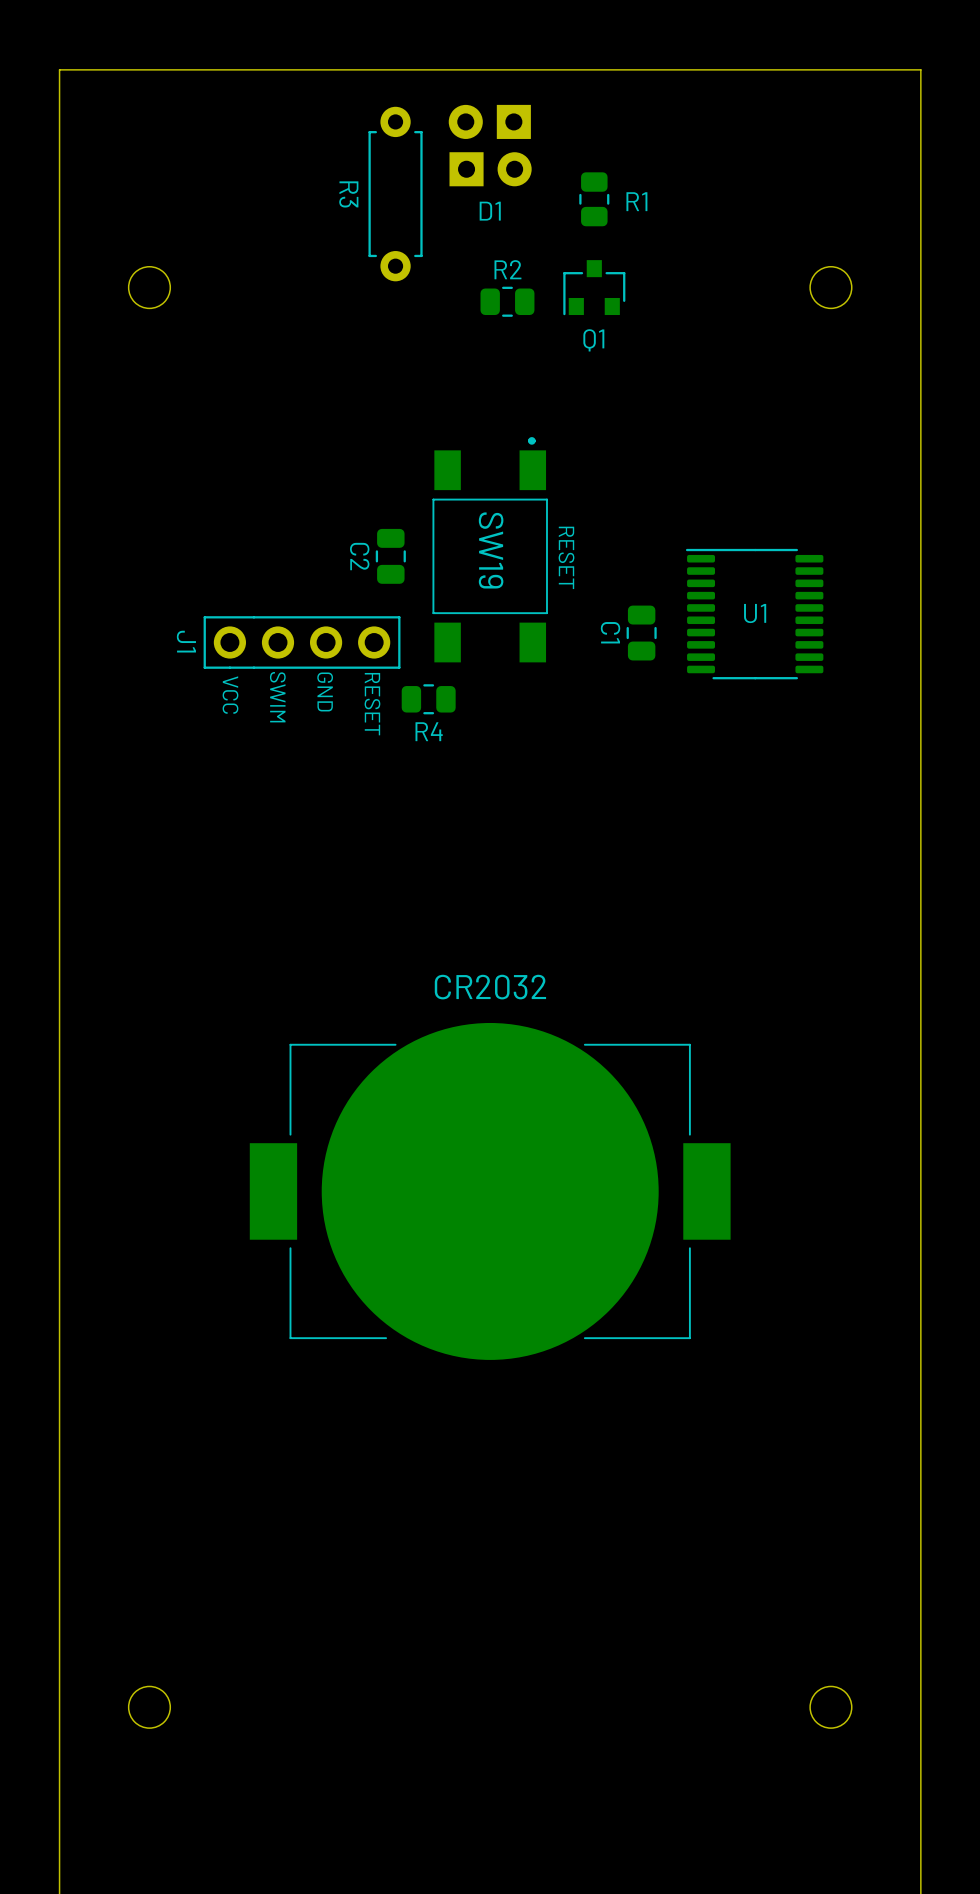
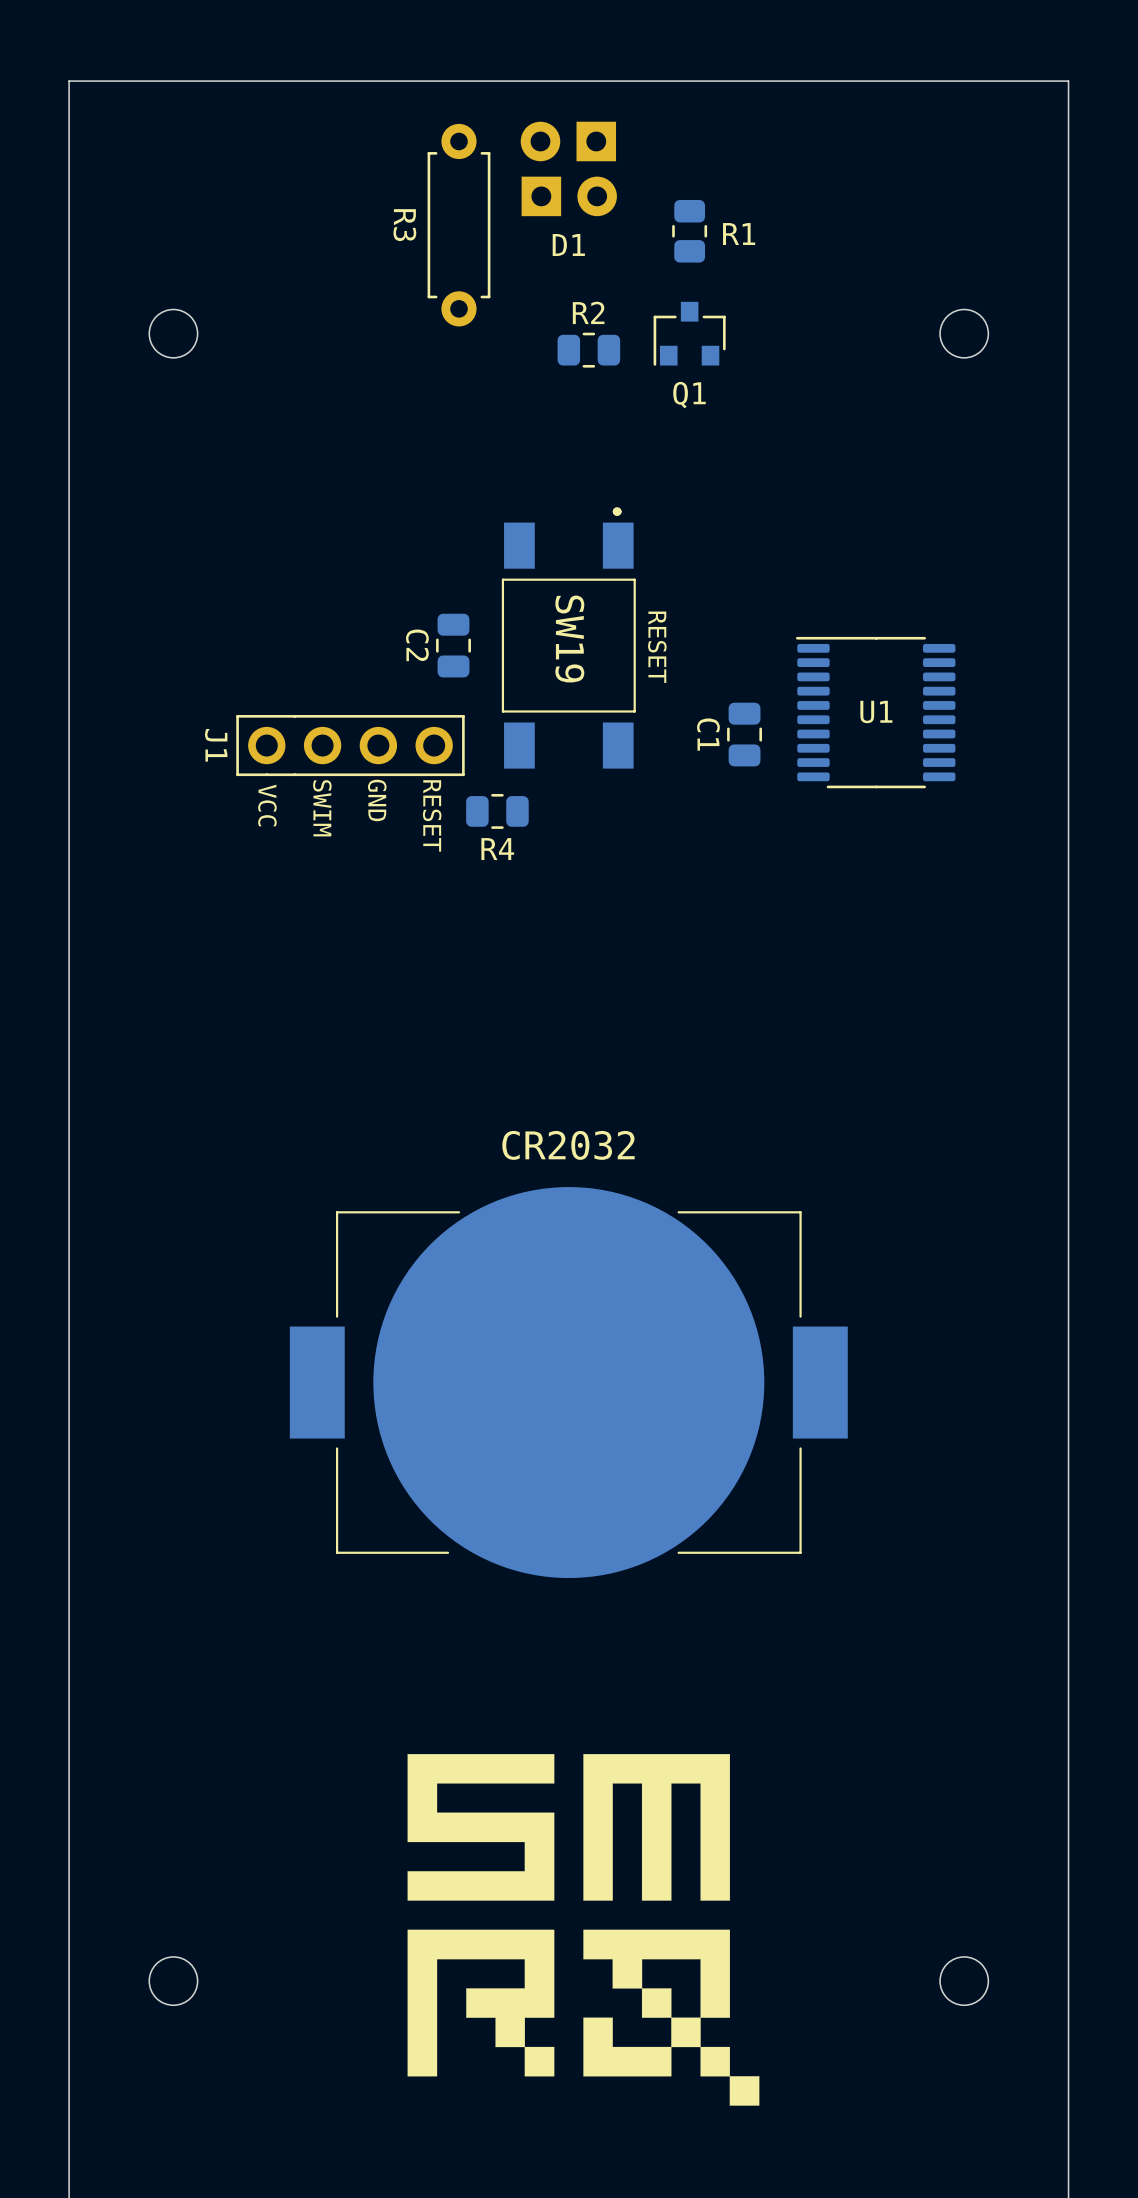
drawing: none -> [407, 1754, 760, 2106]

